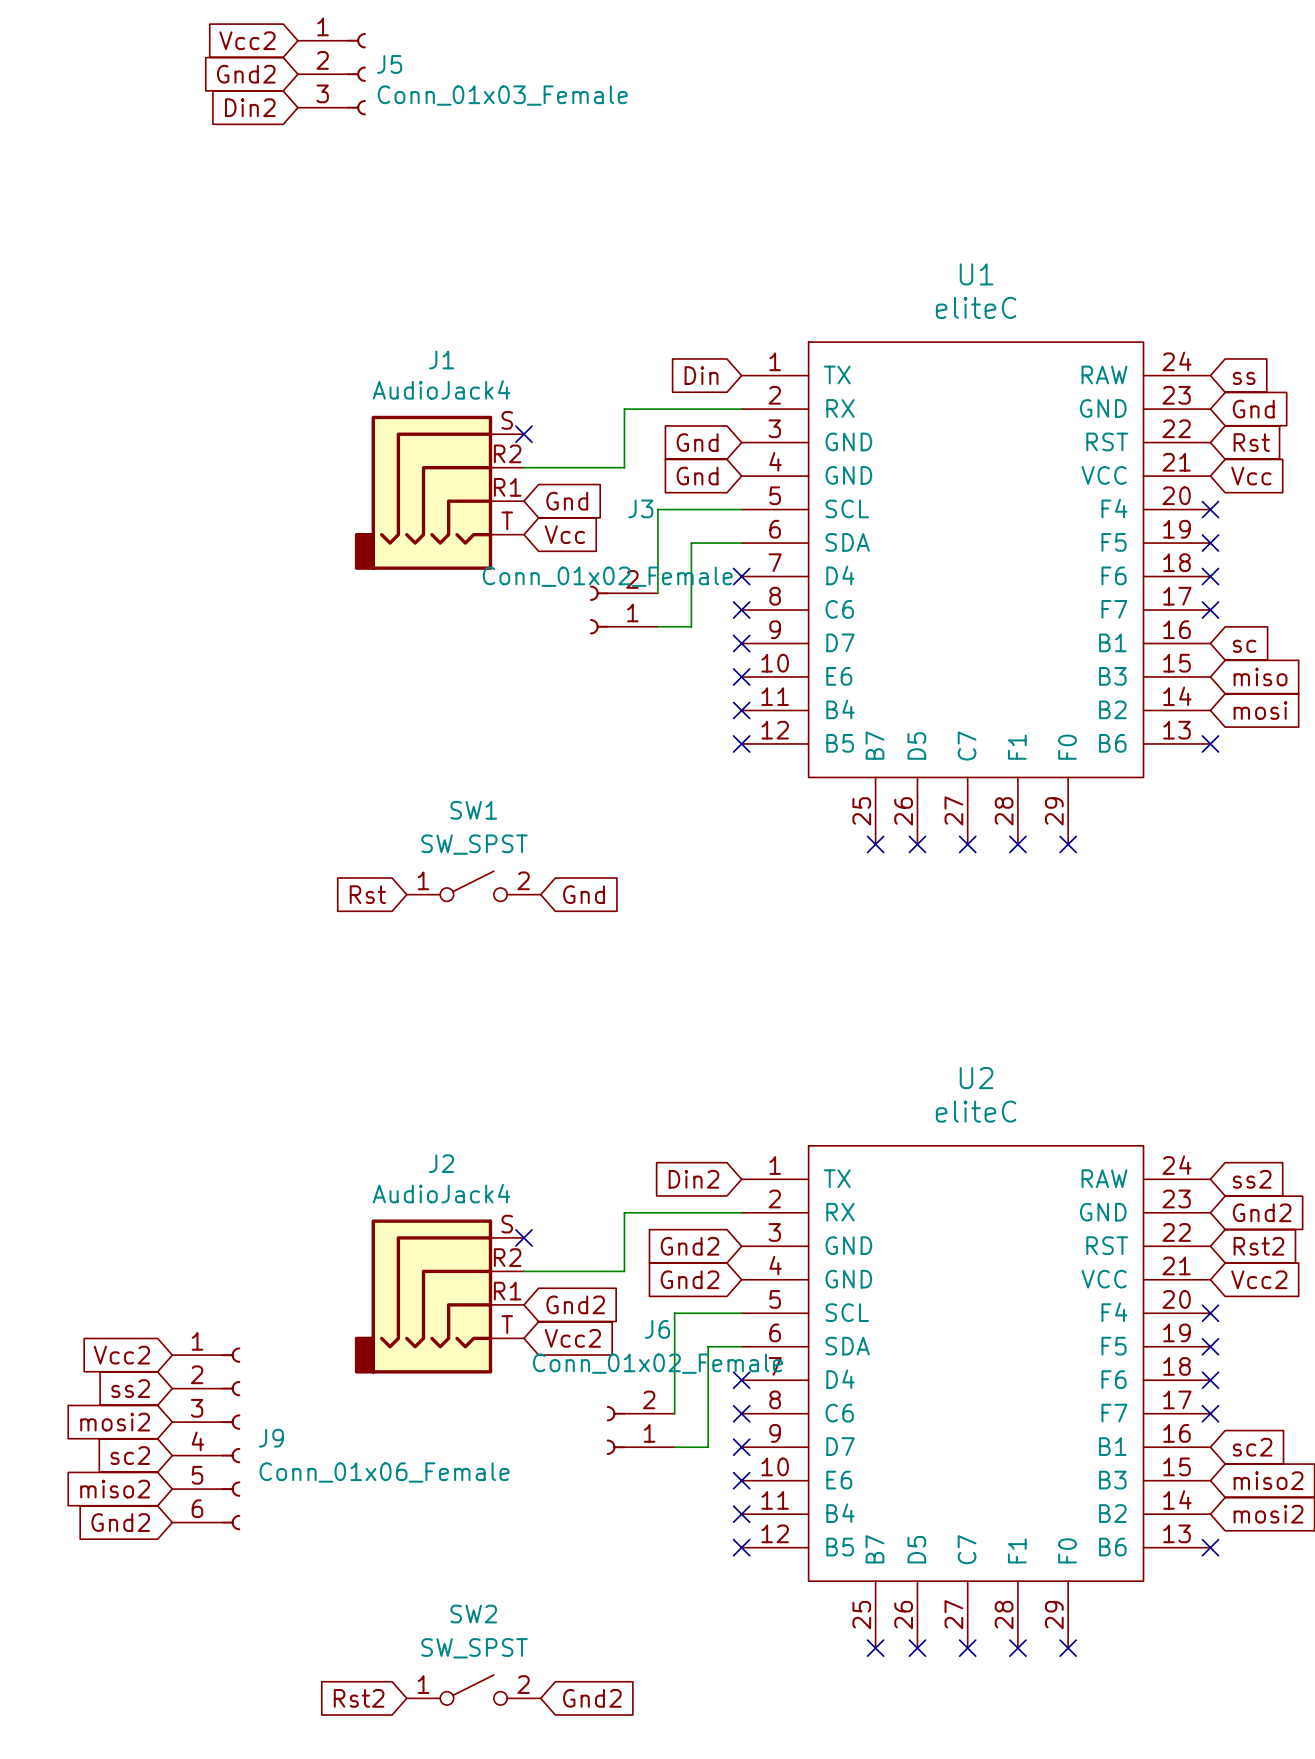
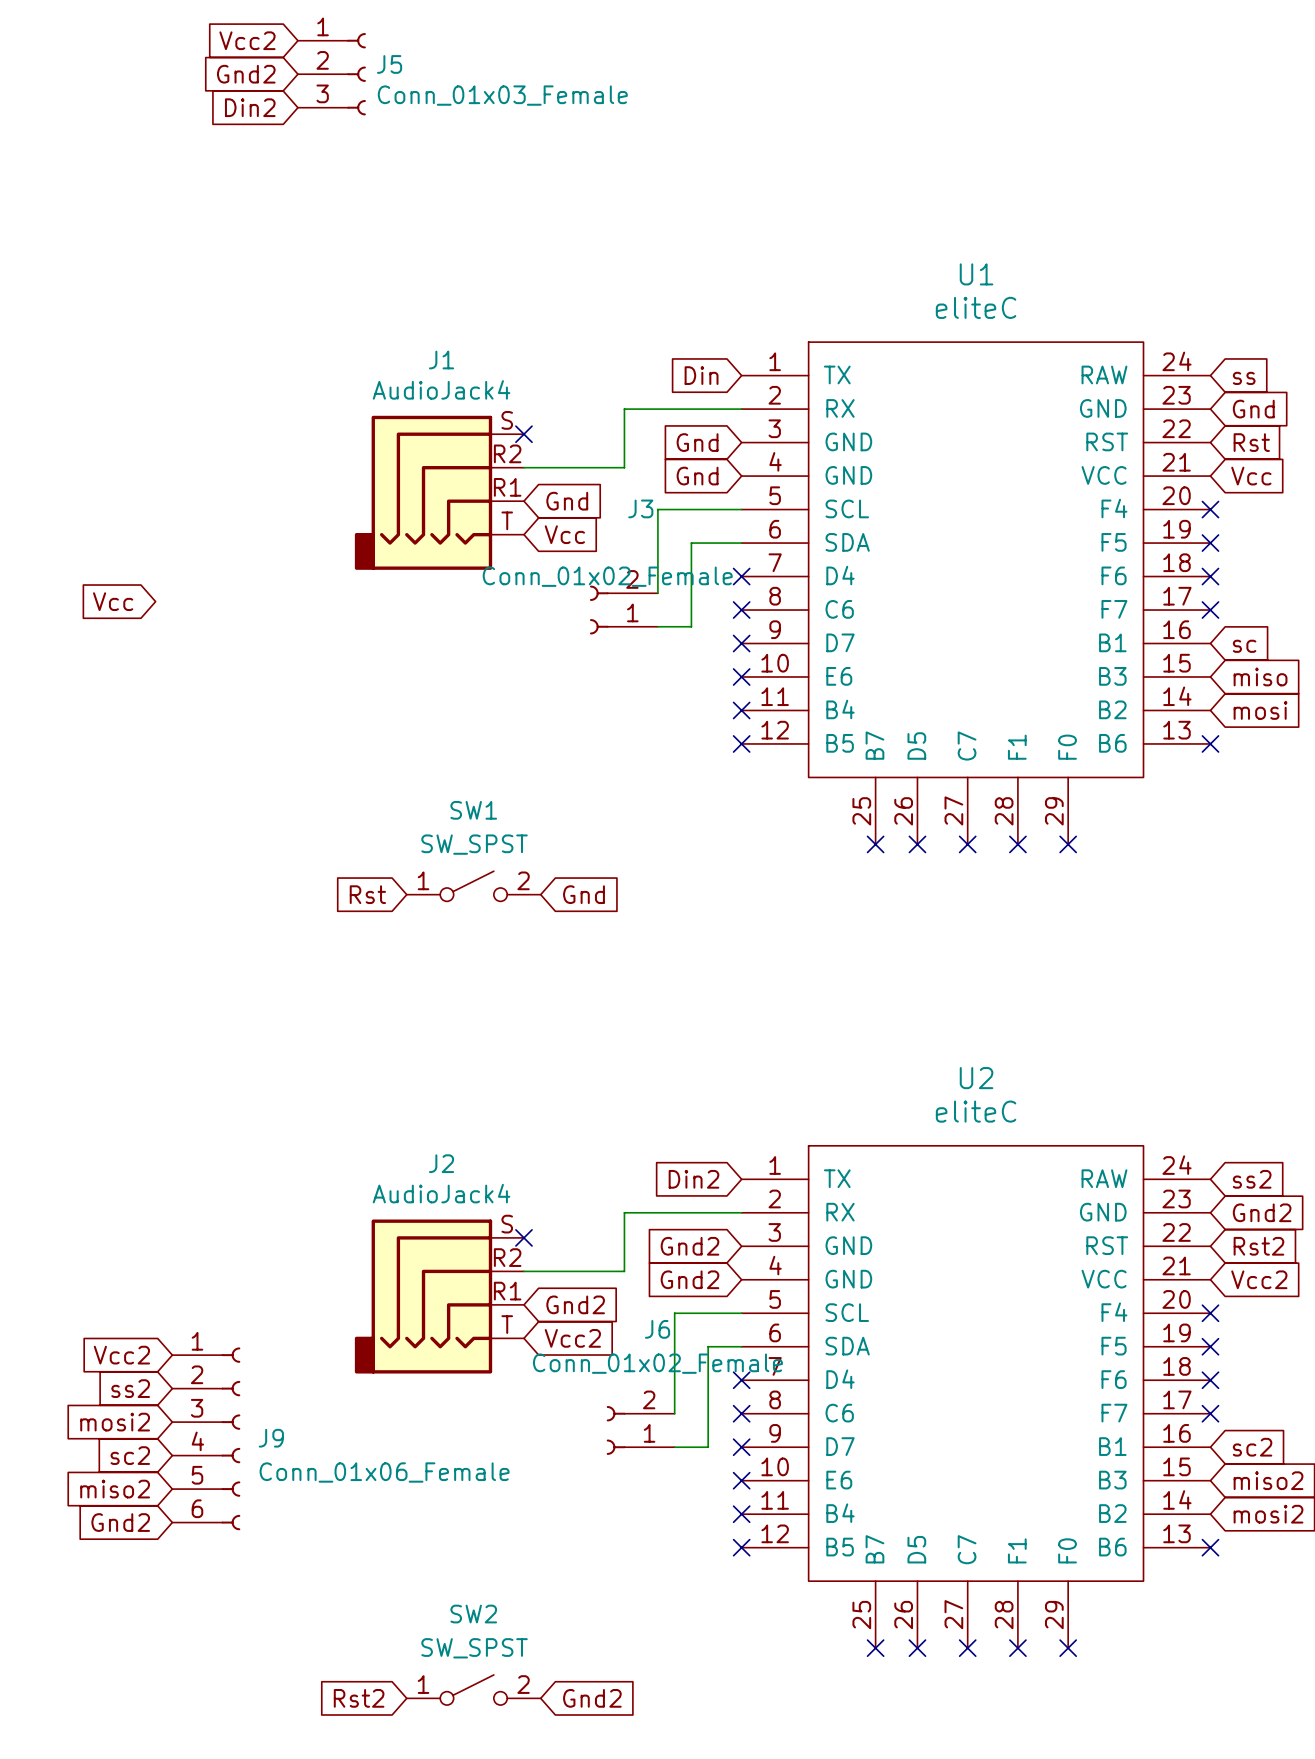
global label: none -> Vcc (113, 601)

